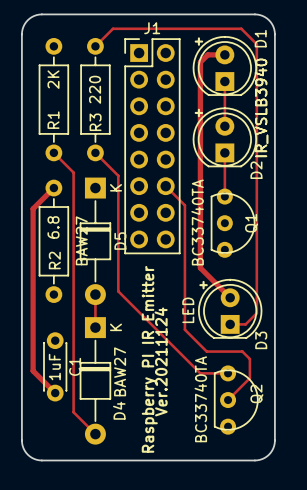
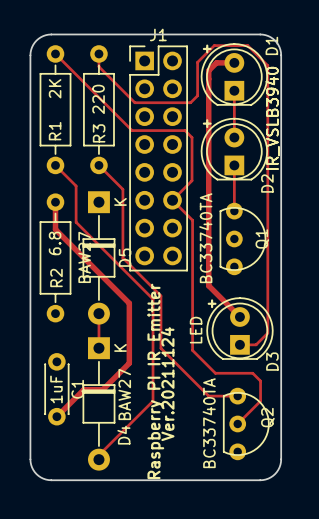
board edge: (41, 14) (254, 14) (264, 17) (272, 24) (274, 34) (274, 440) (272, 450) (264, 457) (254, 460) (41, 460) (31, 457) (24, 450) (21, 440) (21, 34) (23, 26) (27, 20) (34, 15) (41, 14) -> (51, 34) (43, 36) (36, 40) (32, 47) (30, 55) (30, 459) (32, 467) (40, 477) (51, 480) (260, 480) (268, 478) (278, 469) (281, 459) (281, 55) (279, 47) (270, 37) (260, 34) (51, 34)
track: none -> (55, 53) (132, 130) (185, 130) (192, 137) (192, 180) (172, 200)
track: (95, 46) (113, 28) (241, 28) (256, 44) (256, 57) -> (98, 53) (98, 66) (134, 102) (190, 102) (197, 95) (197, 62) (214, 45) (247, 45) (267, 65)
track: (53, 188) (33, 208) (33, 370) (55, 393) -> (55, 202) (55, 229) (129, 303) (129, 363) (102, 389) (83, 389) (56, 416)
track: (73, 207) (73, 412) (95, 434) -> (76, 222) (153, 299) (153, 401) (98, 455)
track: (118, 241) (118, 291) (154, 327) -> (122, 258) (160, 295) (160, 348)

